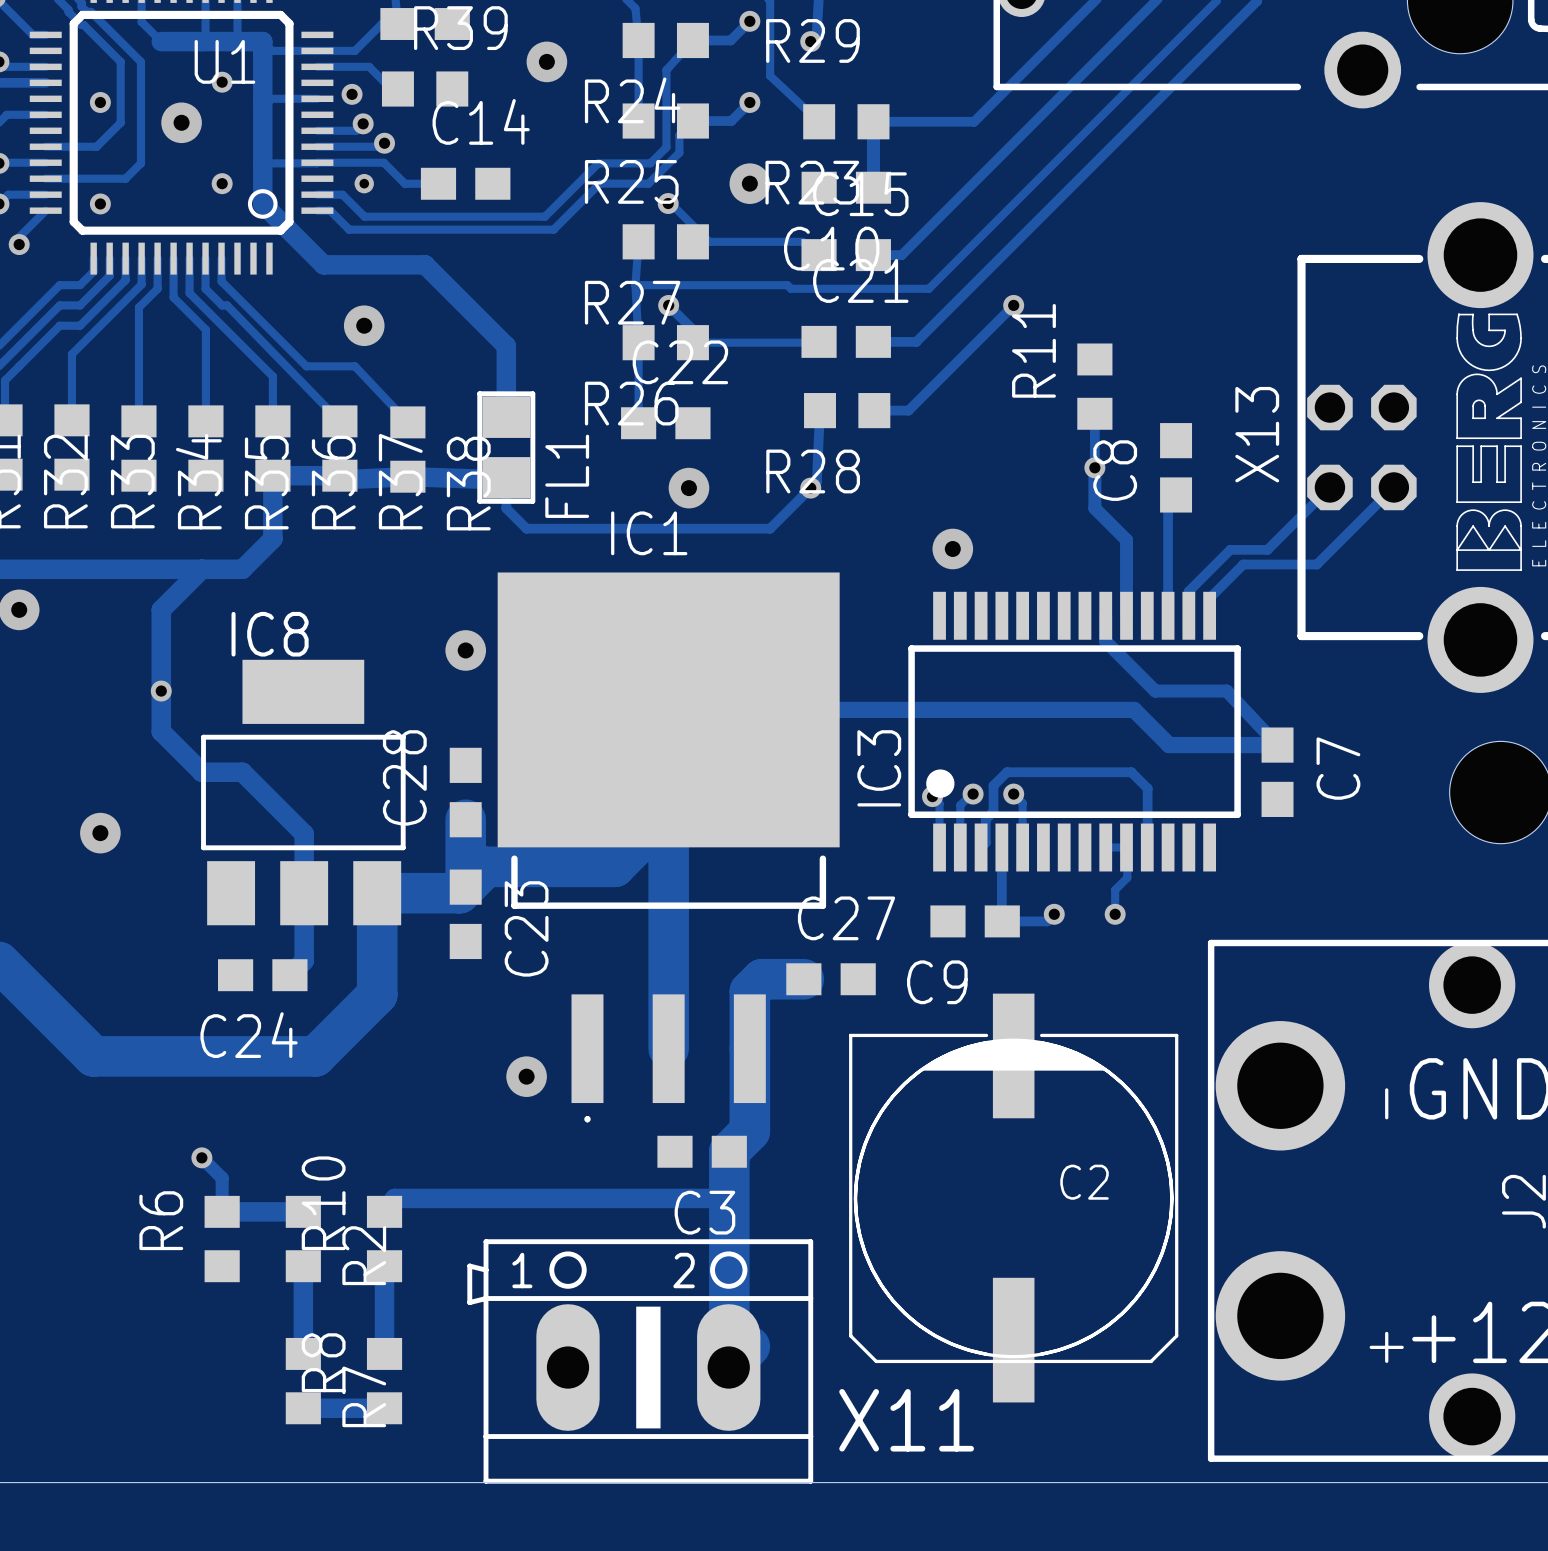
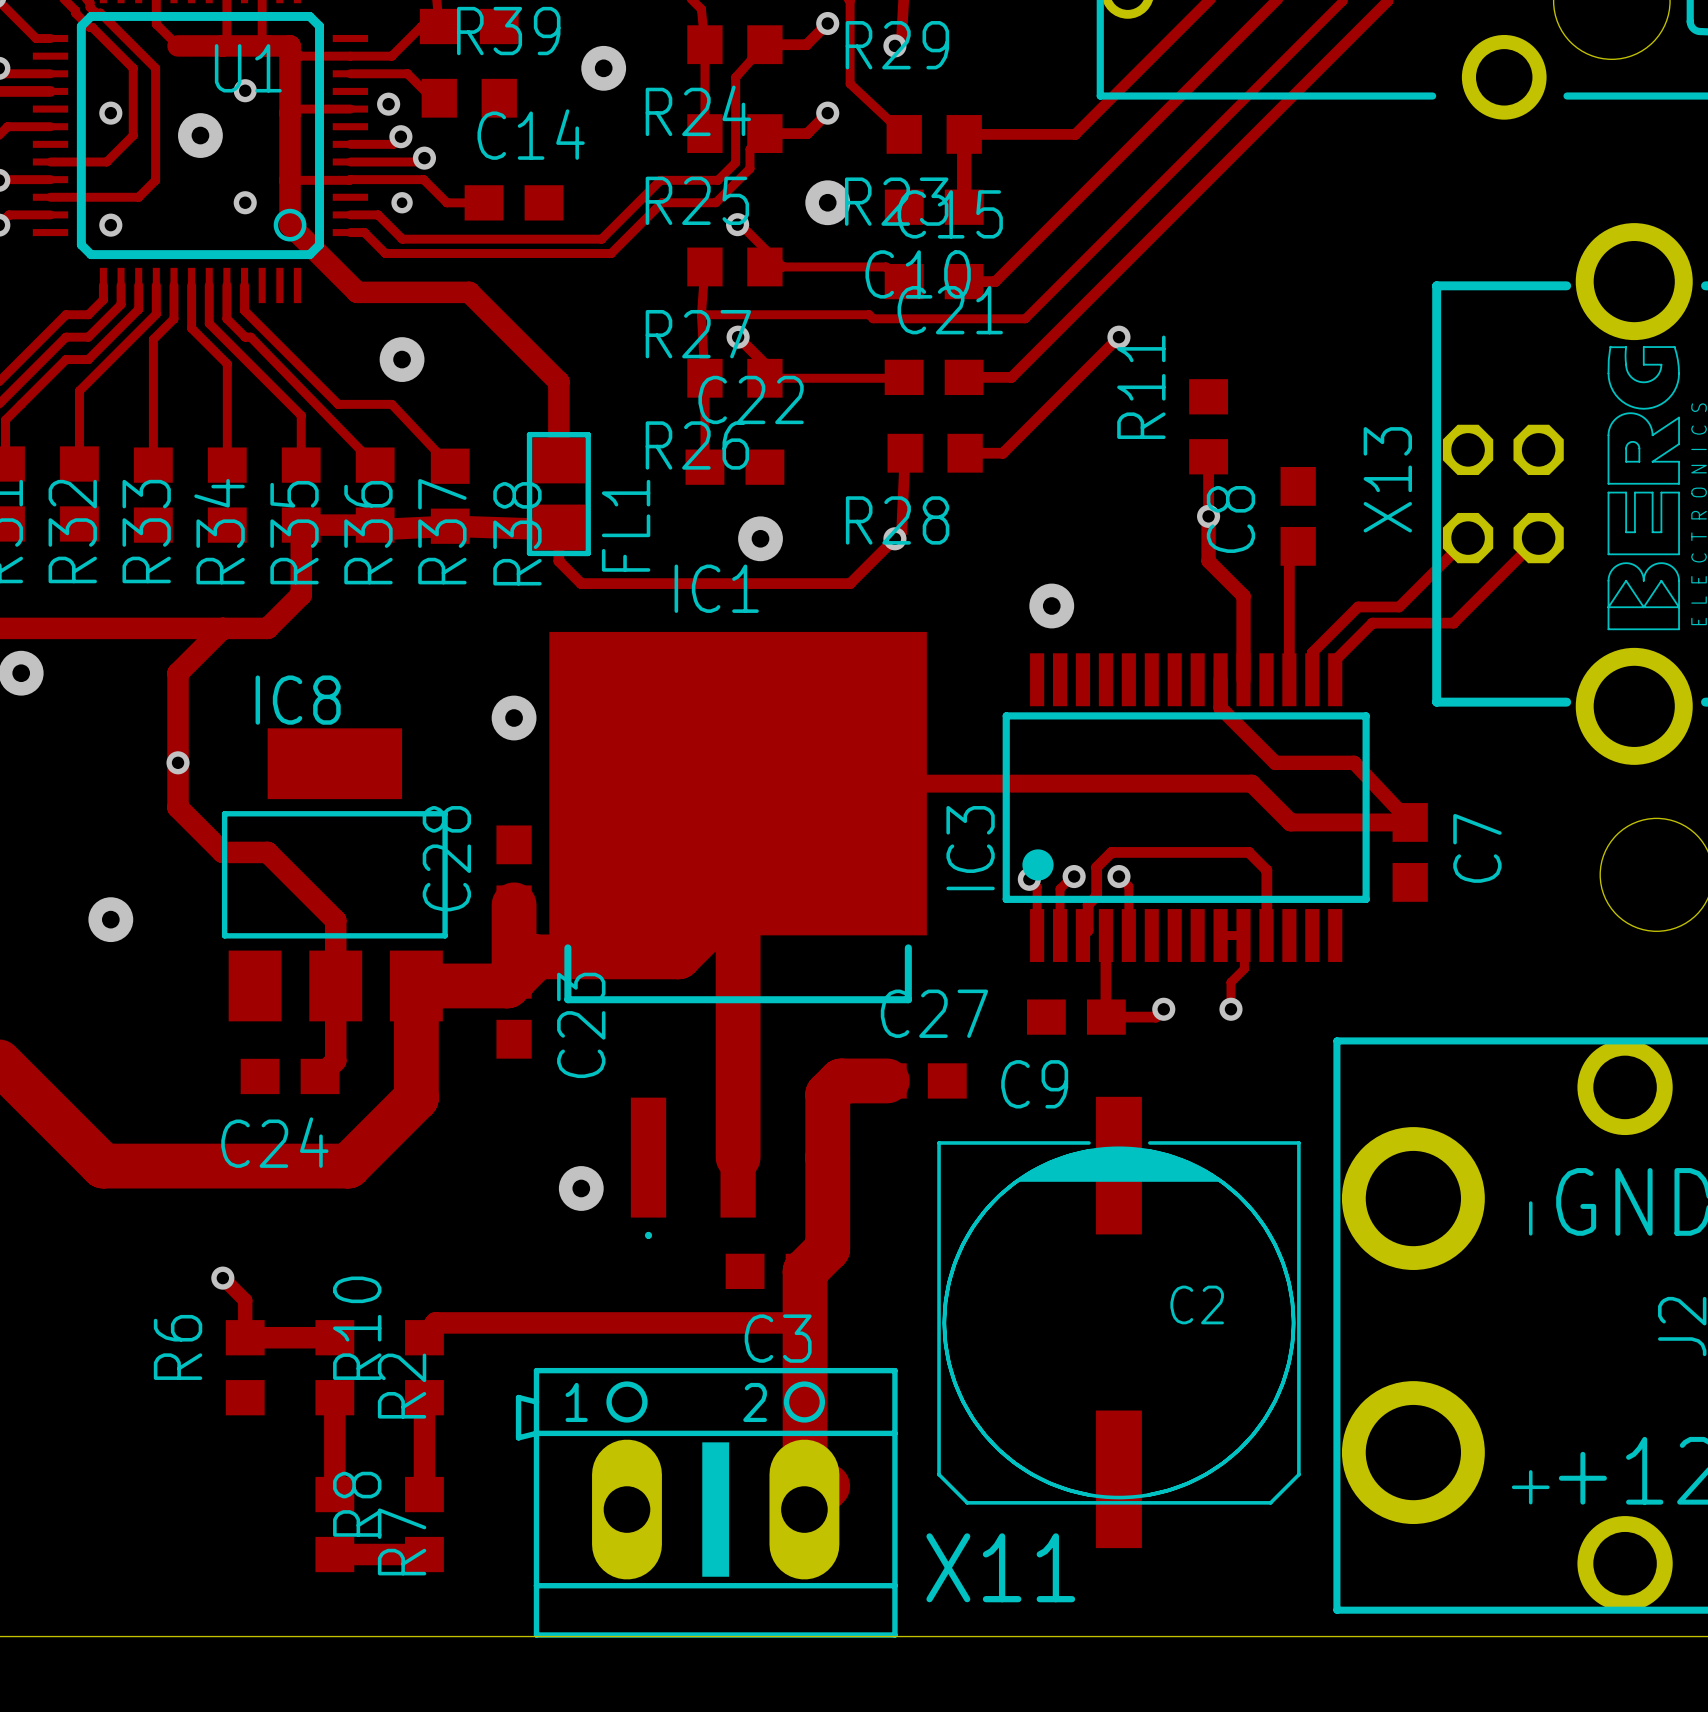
track: (45, 210) (19, 237) (19, 244) -> none
via: (19, 244) -> none

